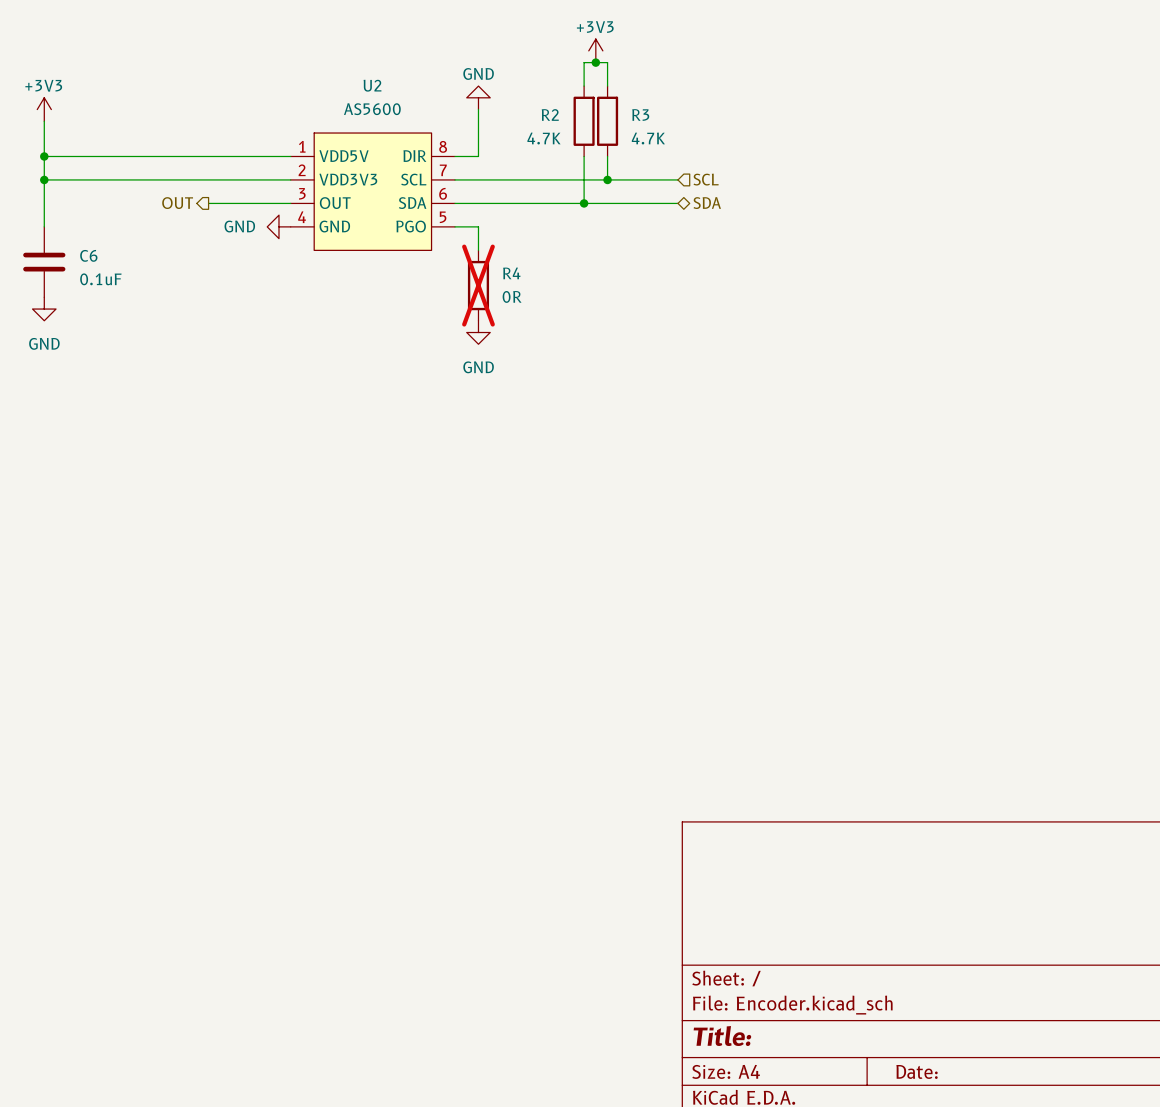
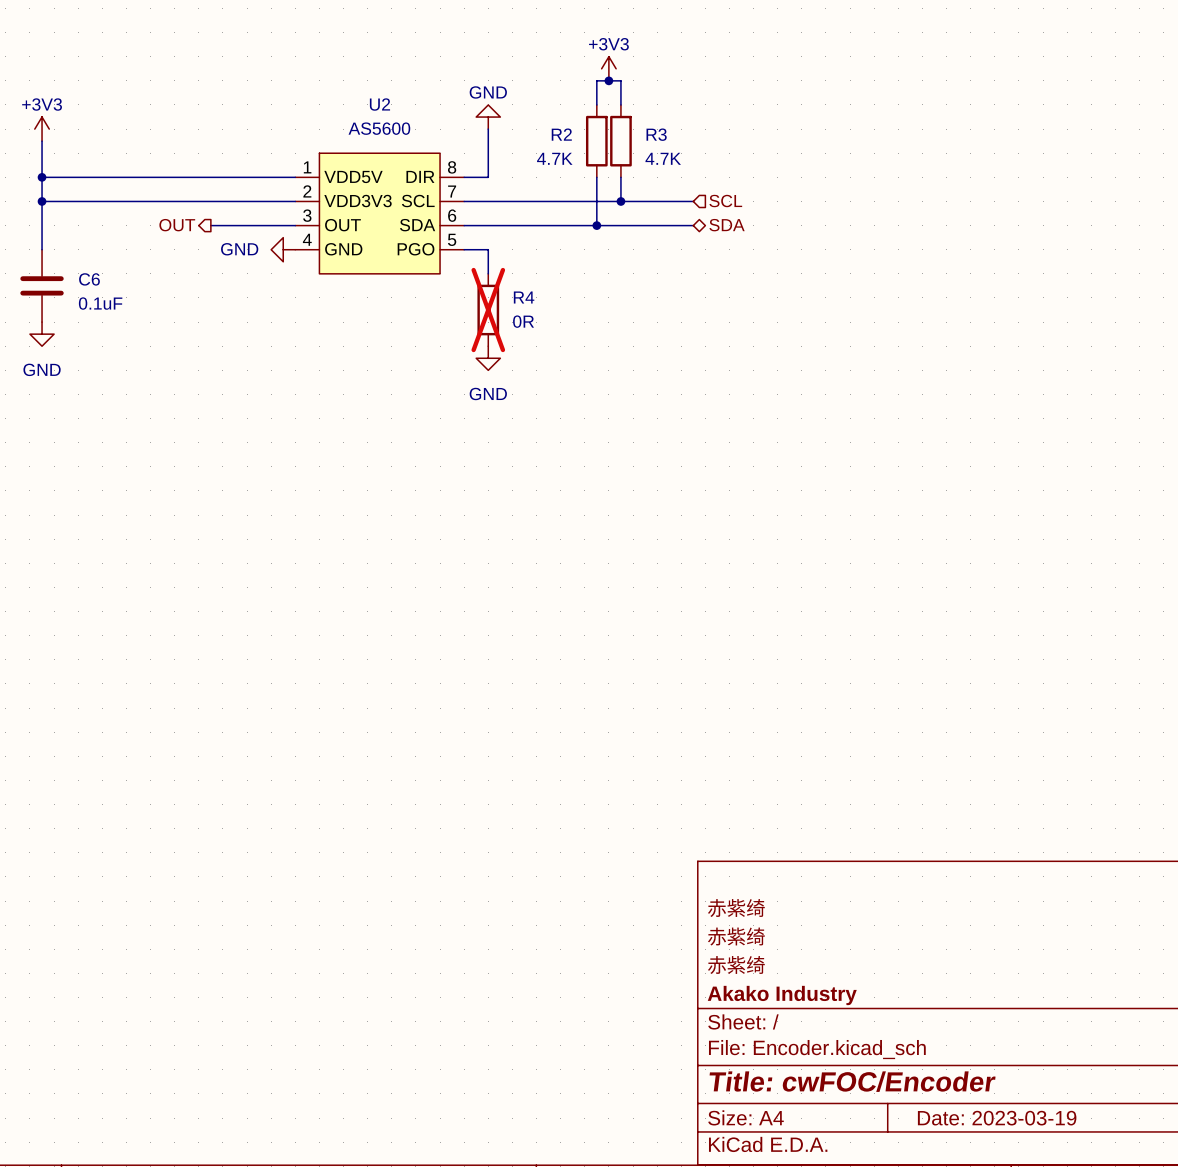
title block: none -> 赤紫绮 (736, 908)
title block: none -> 赤紫绮 (736, 936)
title block: none -> 赤紫绮 (736, 965)
title block: none -> Akako Industry (782, 995)
title block: Title: (722, 1036) -> Title: cwFOC/Encoder (852, 1081)
title block: Date: (917, 1071) -> Date: 2023-03-19 (997, 1118)

